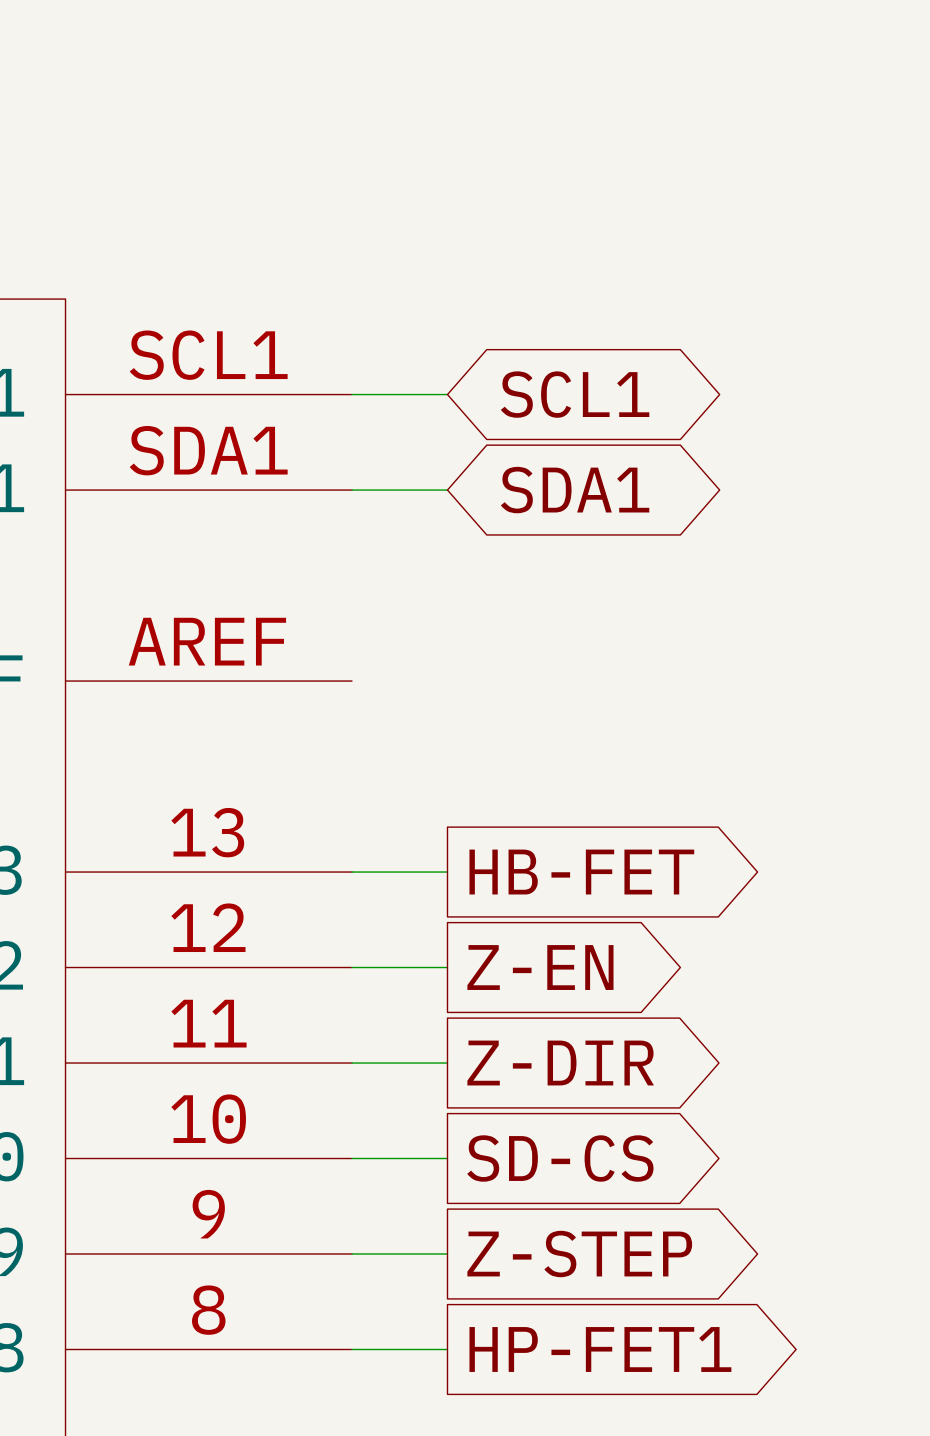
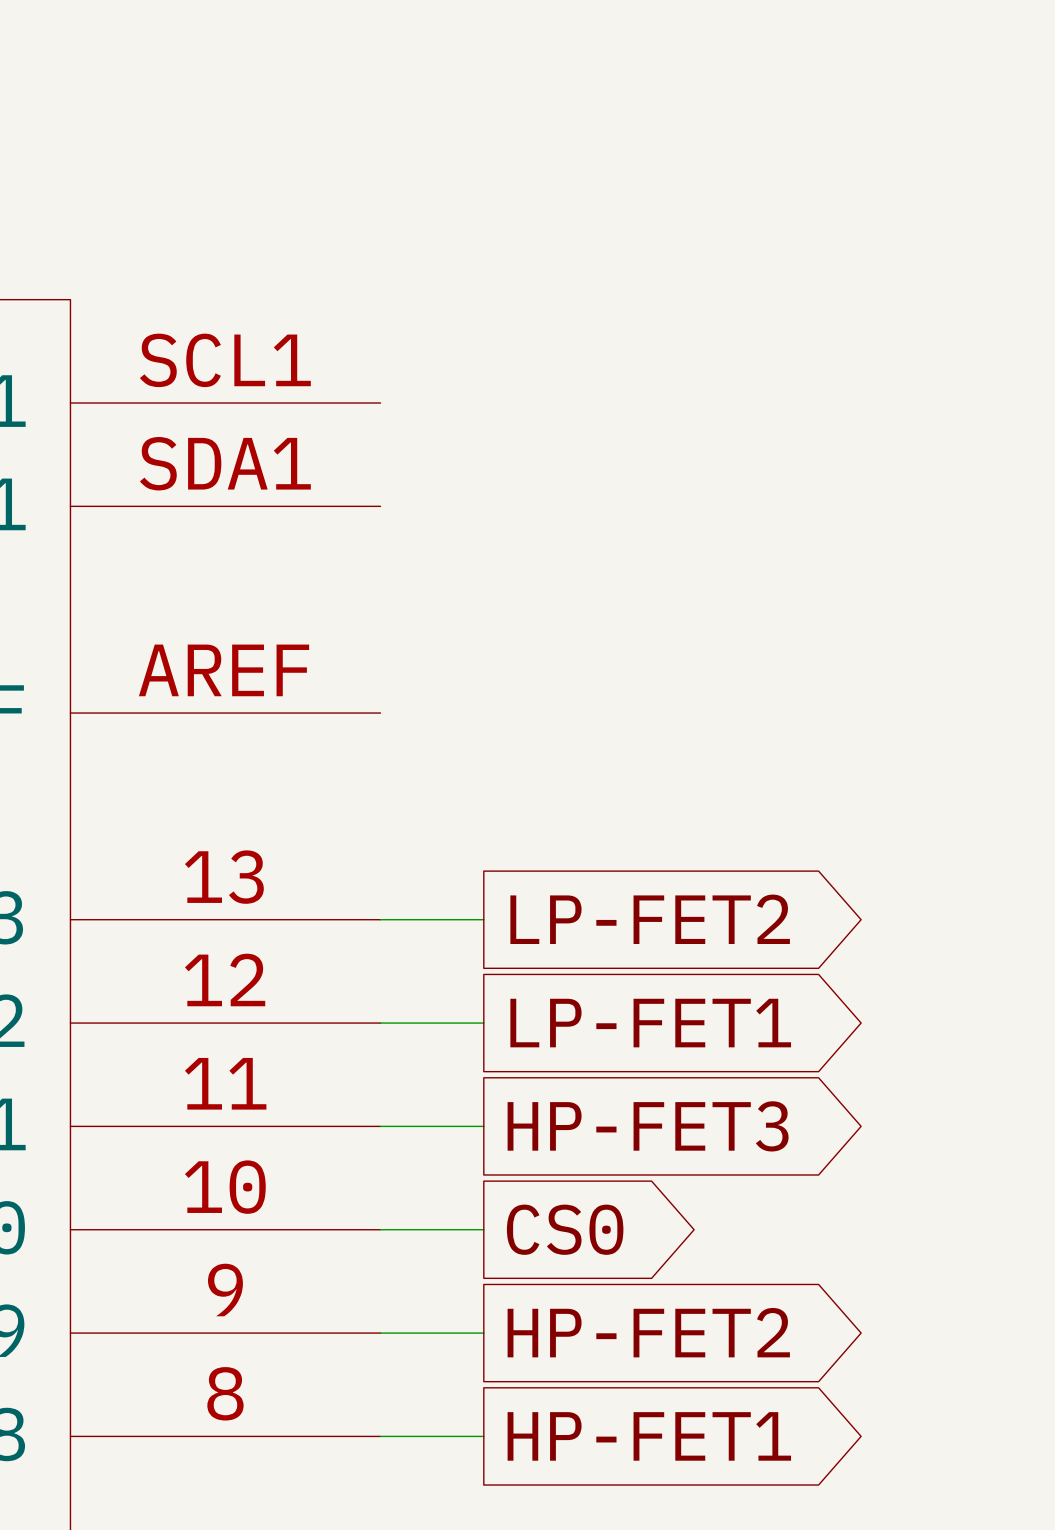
wire: (352, 394) (447, 394) -> none
global label: SCL1 (575, 394) -> none
wire: (352, 490) (447, 490) -> none
global label: SDA1 (575, 490) -> none
global label: HB-FET (581, 872) -> LP-FET2 (650, 919)
global label: Z-EN (540, 967) -> LP-FET1 (650, 1023)
global label: Z-DIR (560, 1063) -> HP-FET3 (648, 1126)
global label: SD-CS (560, 1158) -> CS0 (565, 1229)
global label: Z-STEP (579, 1254) -> HP-FET2 (648, 1332)

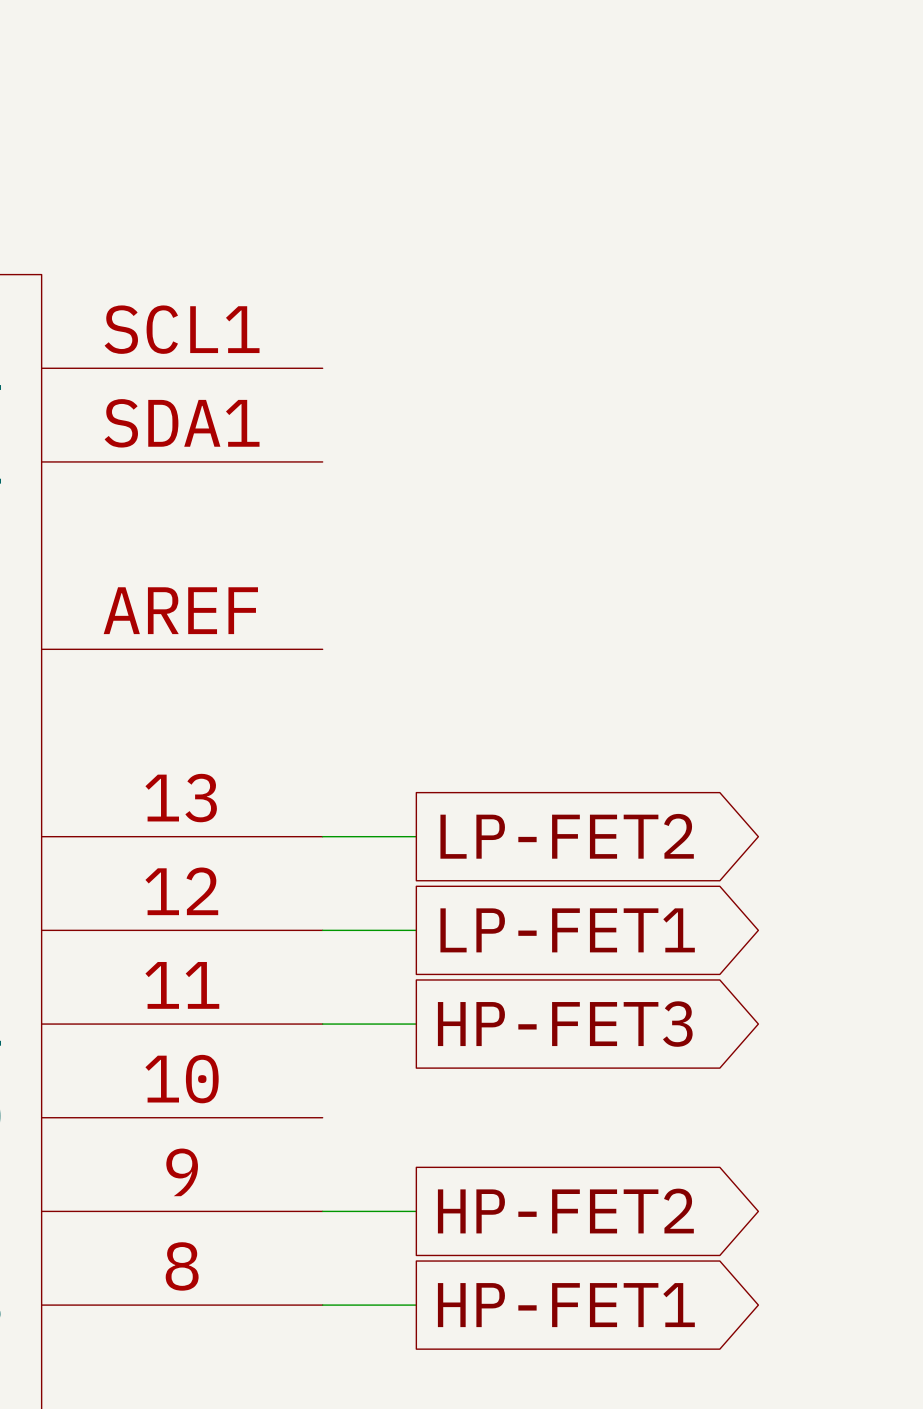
wire: (380, 1229) (483, 1229) -> none
global label: CS0 (565, 1229) -> none

